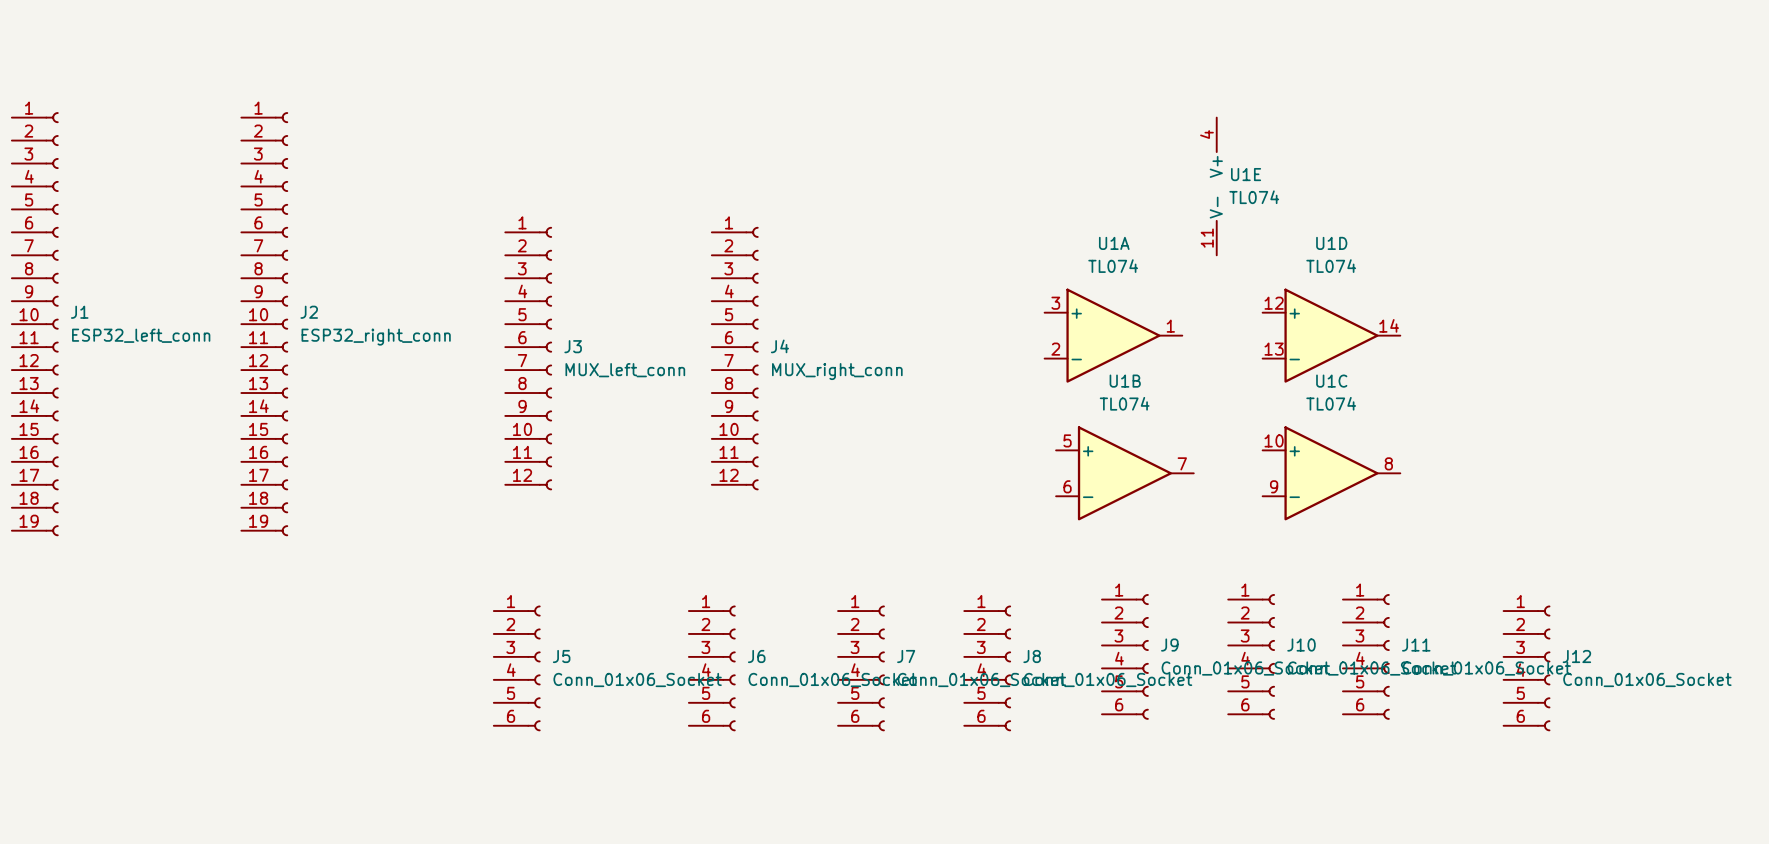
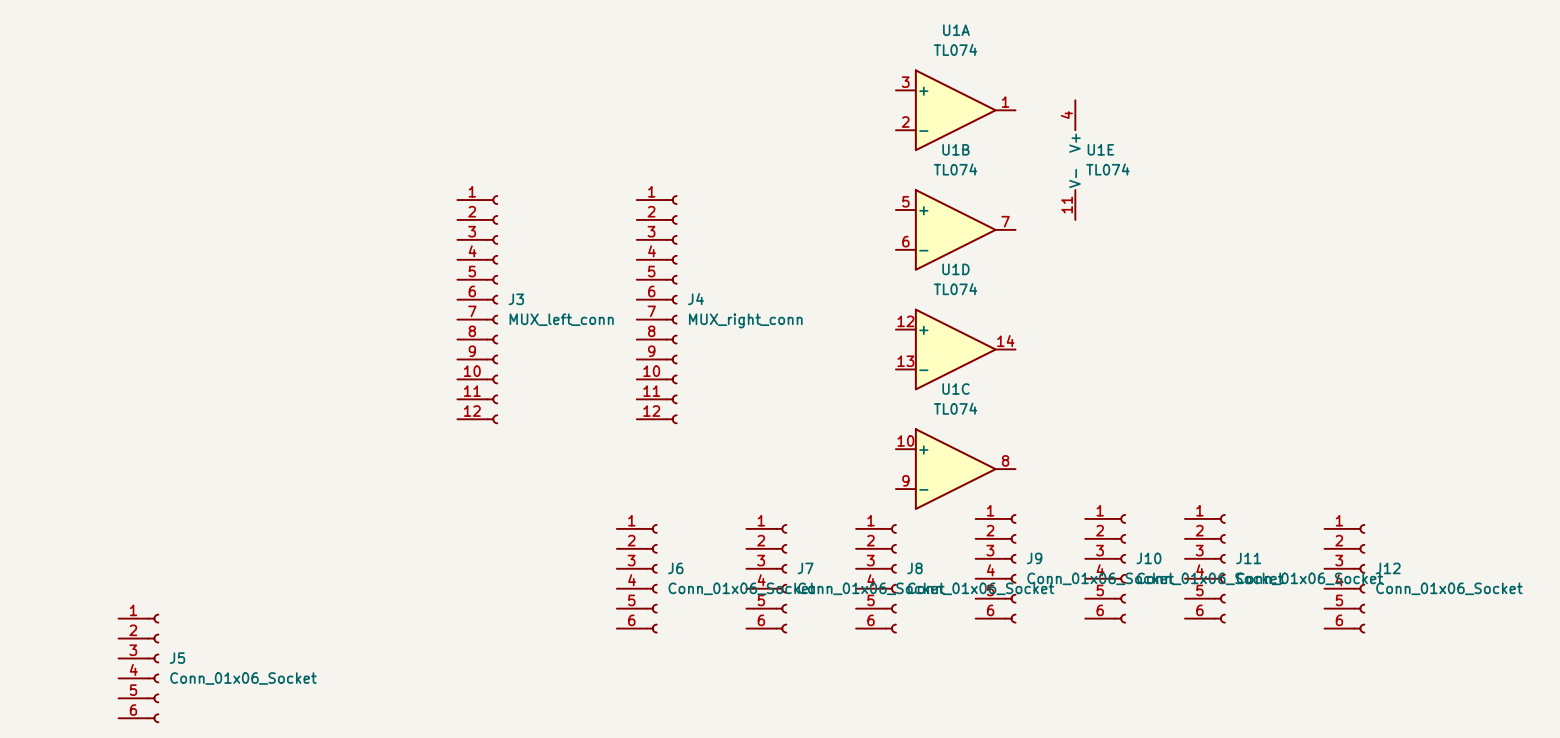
J1: ESP32_left_conn (35, 324) -> none
J2: ESP32_right_conn (264, 324) -> none
U1A position: (1113, 335) -> (955, 110)
U1D position: (1331, 335) -> (955, 349)
U1B position: (1124, 473) -> (955, 229)
U1C position: (1331, 473) -> (955, 469)
J5 position: (517, 668) -> (138, 668)

